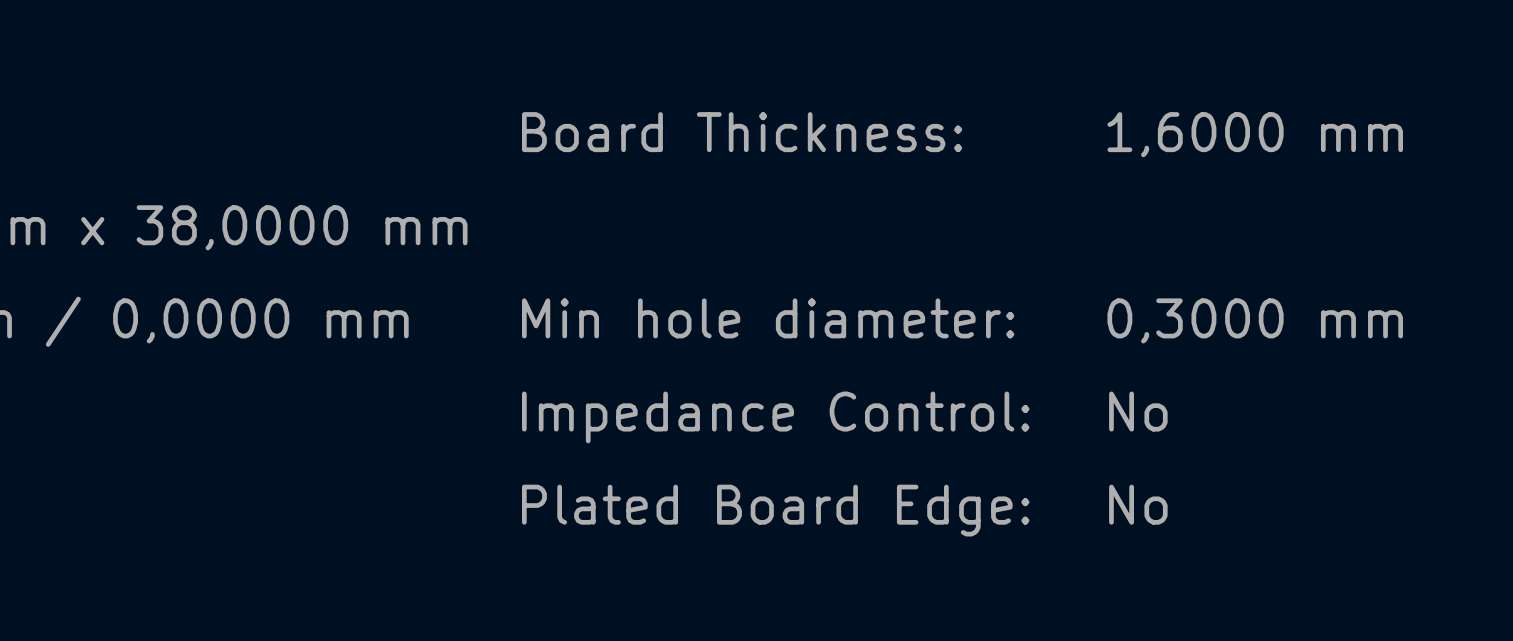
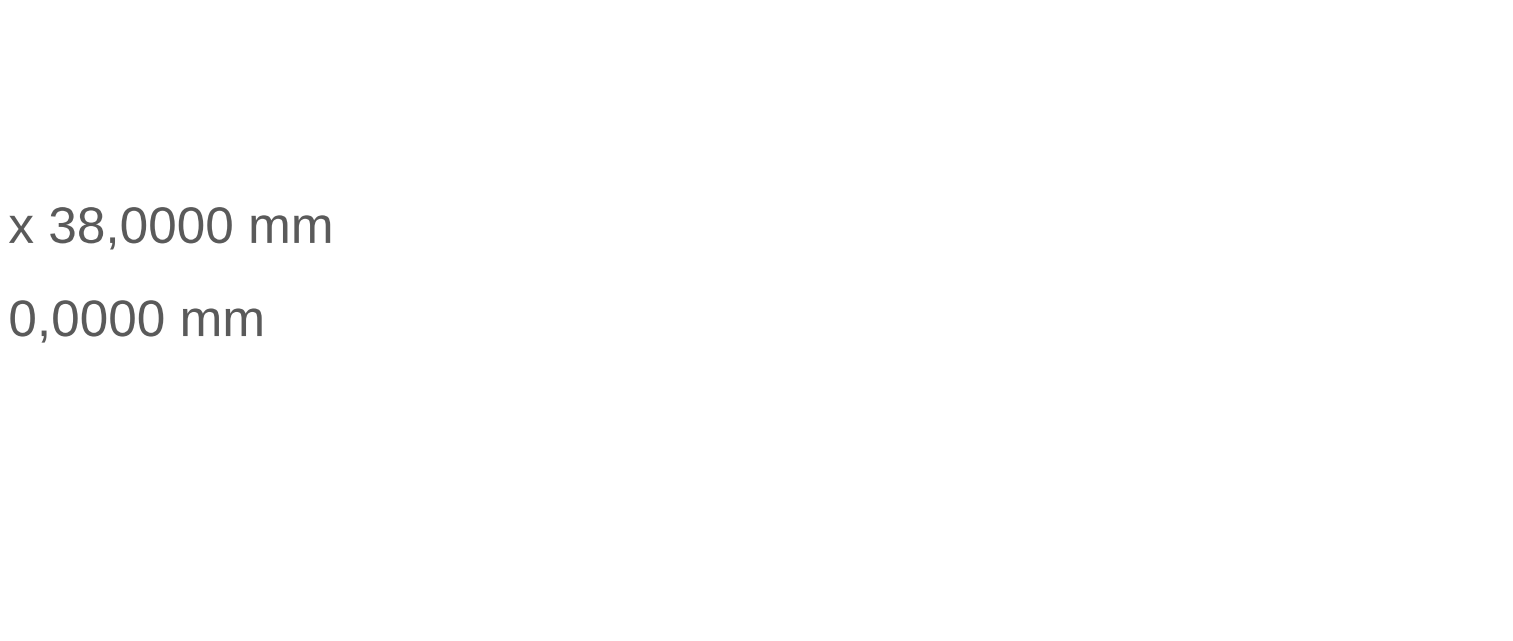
text: Board Thickness: (742, 132) -> none
text: 1,6000 mm (1255, 134) -> none
text: Min hole diameter: (768, 318) -> none
text: 0,3000 mm (1255, 320) -> none
text: No (1138, 411) -> none
text: Impedance Control: (775, 417) -> none
text: No (1138, 504) -> none
text: Plated Board Edge: (775, 510) -> none

